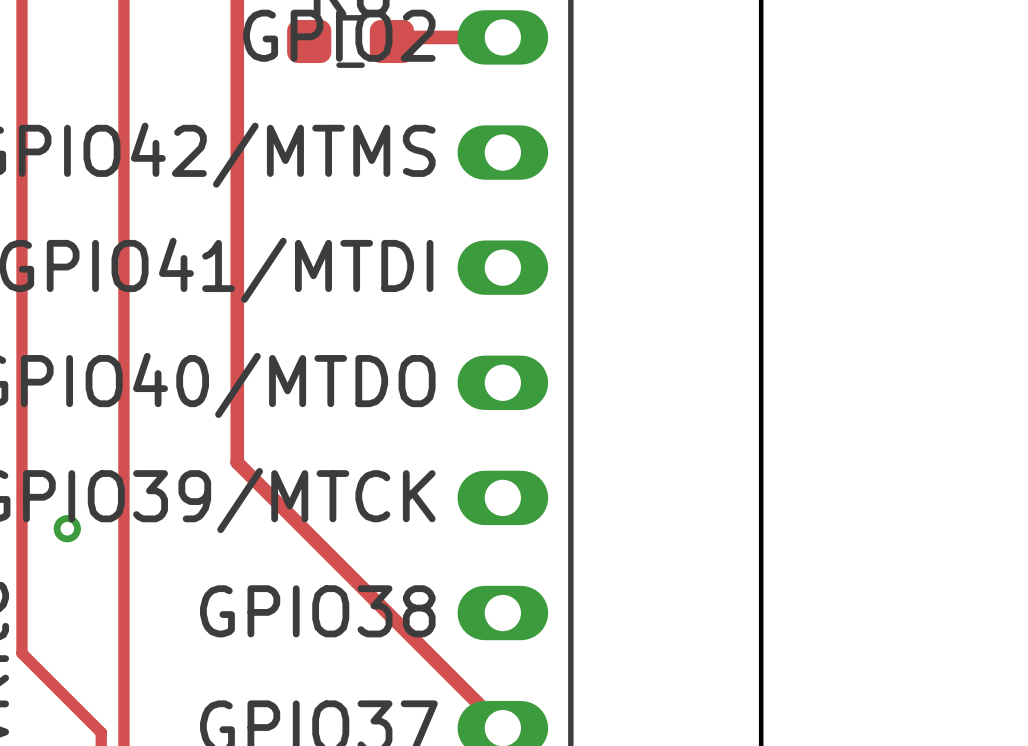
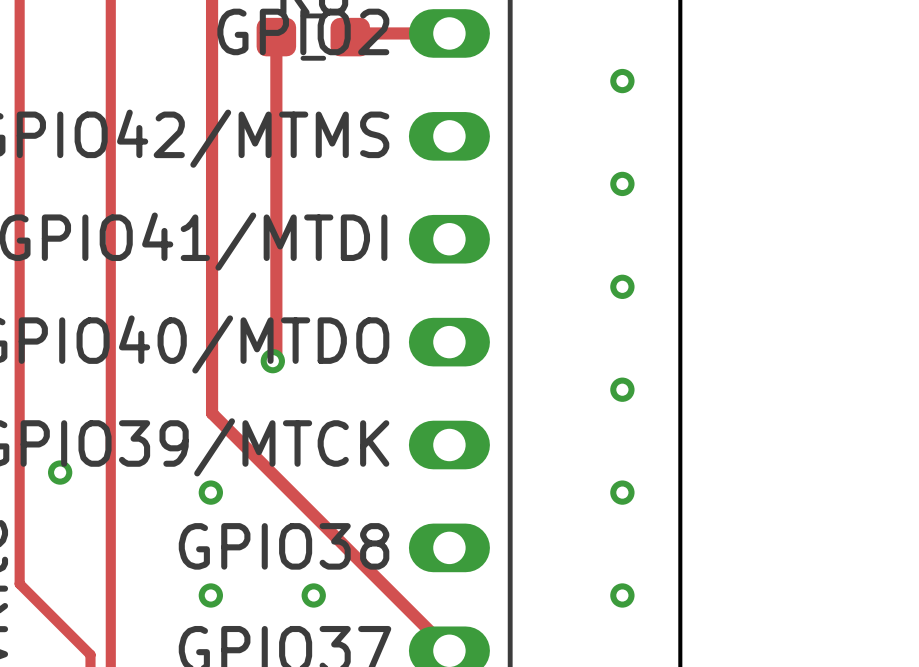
track: none -> (276, 37) (276, 357) (272, 361)
via: none -> (622, 81)
via: none -> (622, 183)
via: none -> (622, 286)
via: none -> (272, 361)
via: none -> (622, 389)
via: none -> (210, 492)
via: none -> (622, 492)
via: none -> (210, 595)
via: none -> (313, 595)
via: none -> (622, 595)

